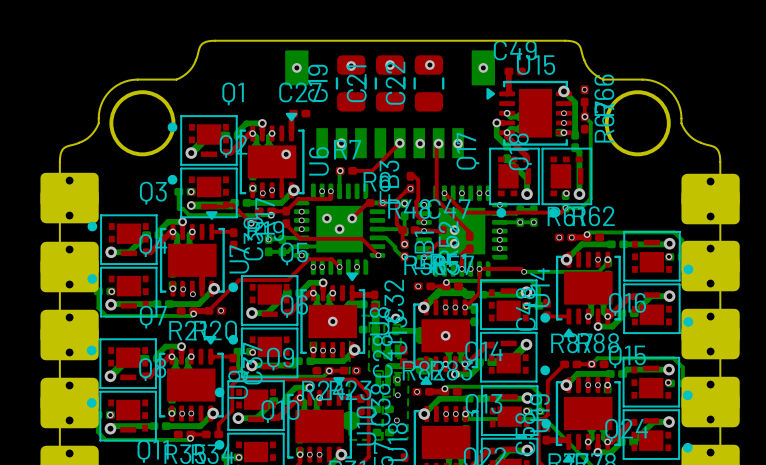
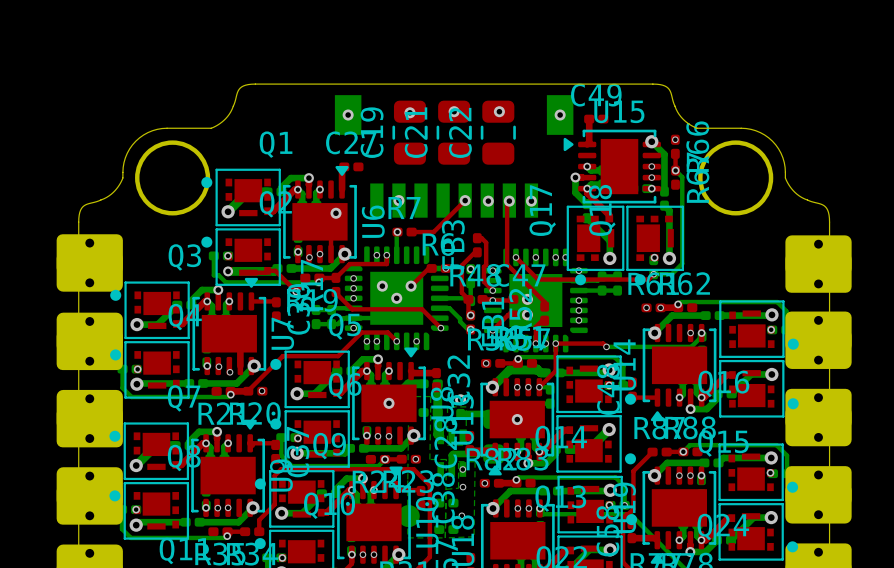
via: (410, 188) -> none
via: (520, 222) -> none
via: (533, 222) -> none
via: (268, 239) -> none

